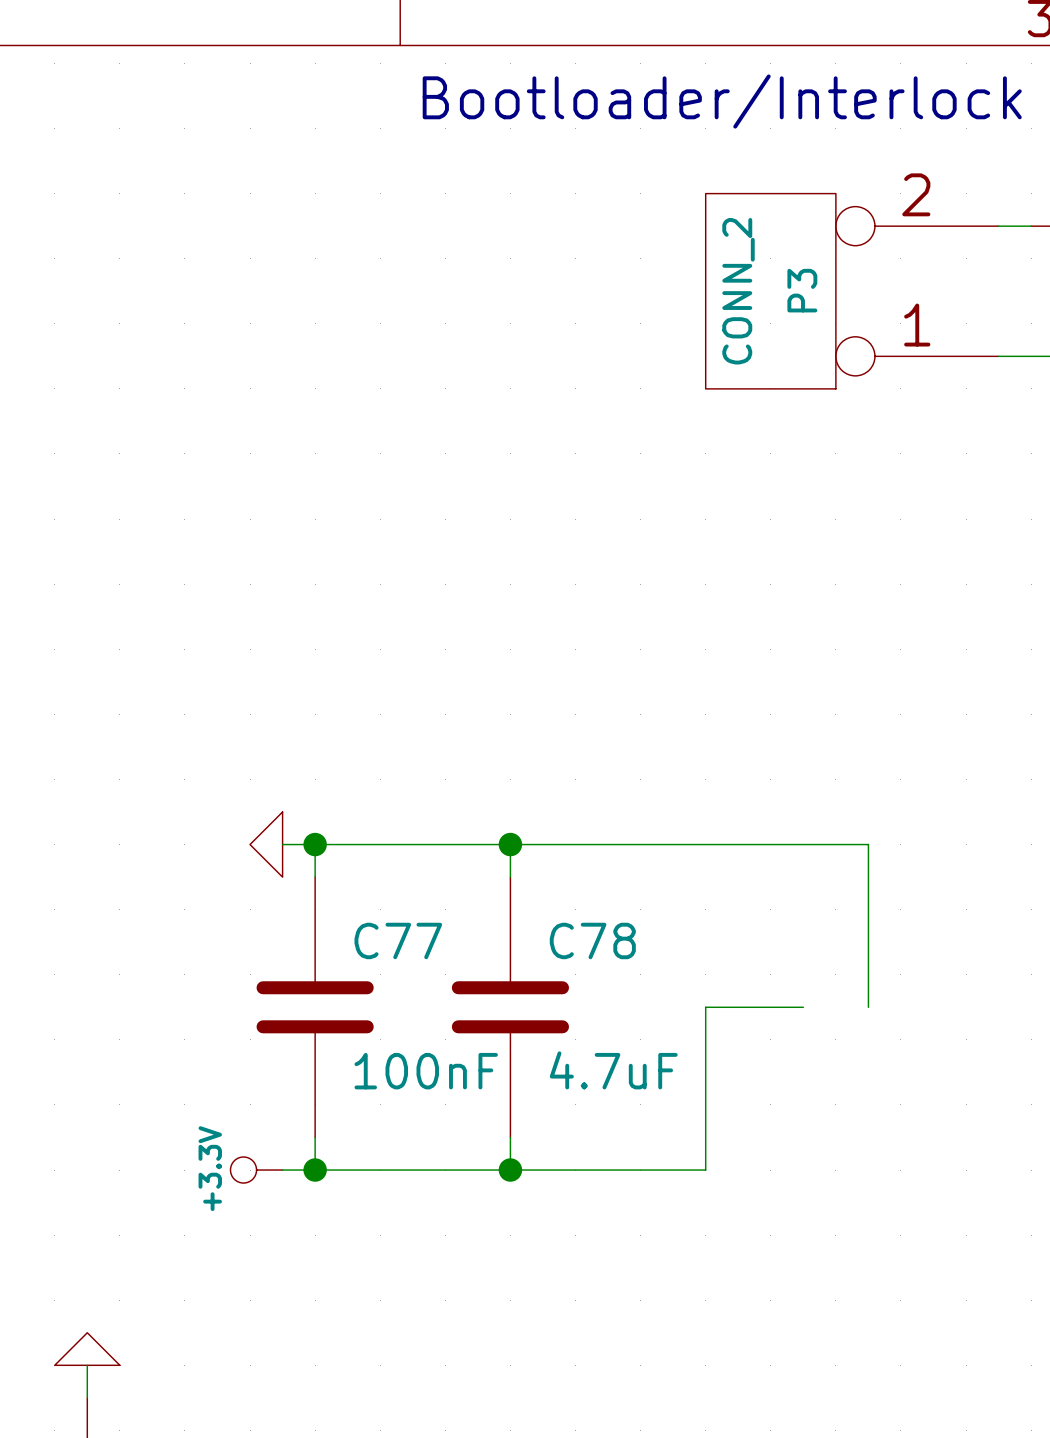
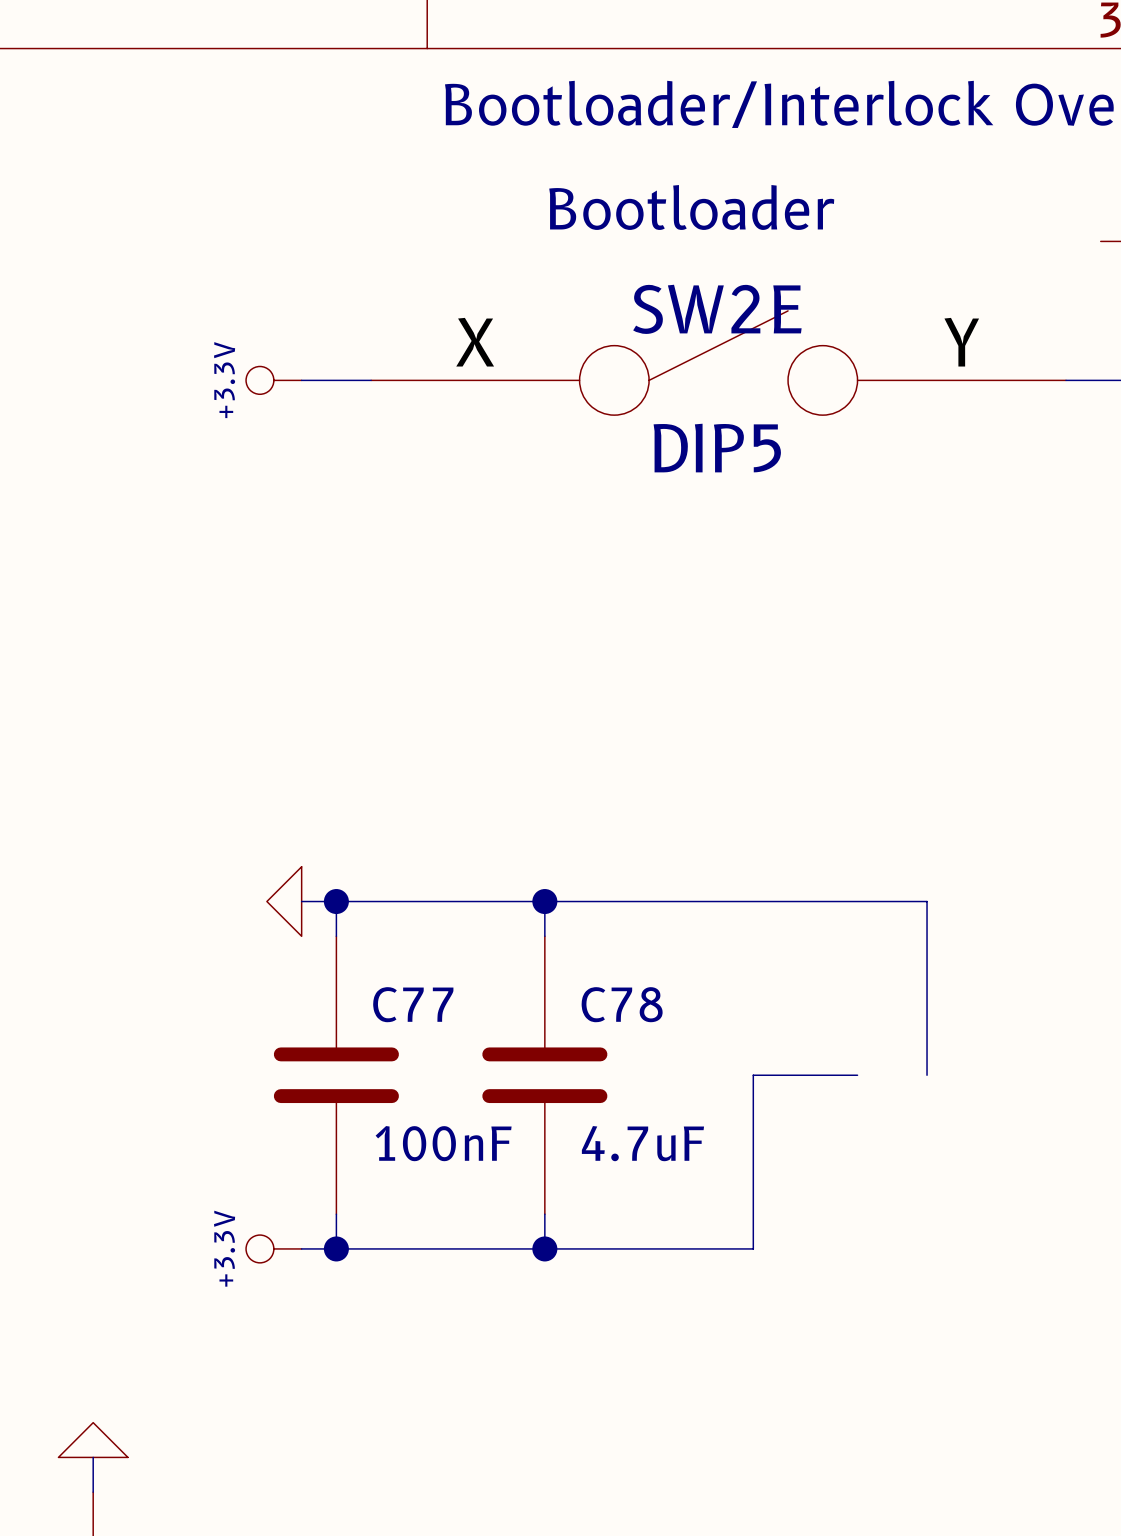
text: none -> Bootloader (691, 207)
wire: (998, 226) (1031, 226) -> none
P3: CONN_2 (852, 291) -> none
SW2E: none -> DIP5 (718, 363)
power symbol: none -> +3.3V (273, 380)
wire: none -> (301, 380) (371, 380)

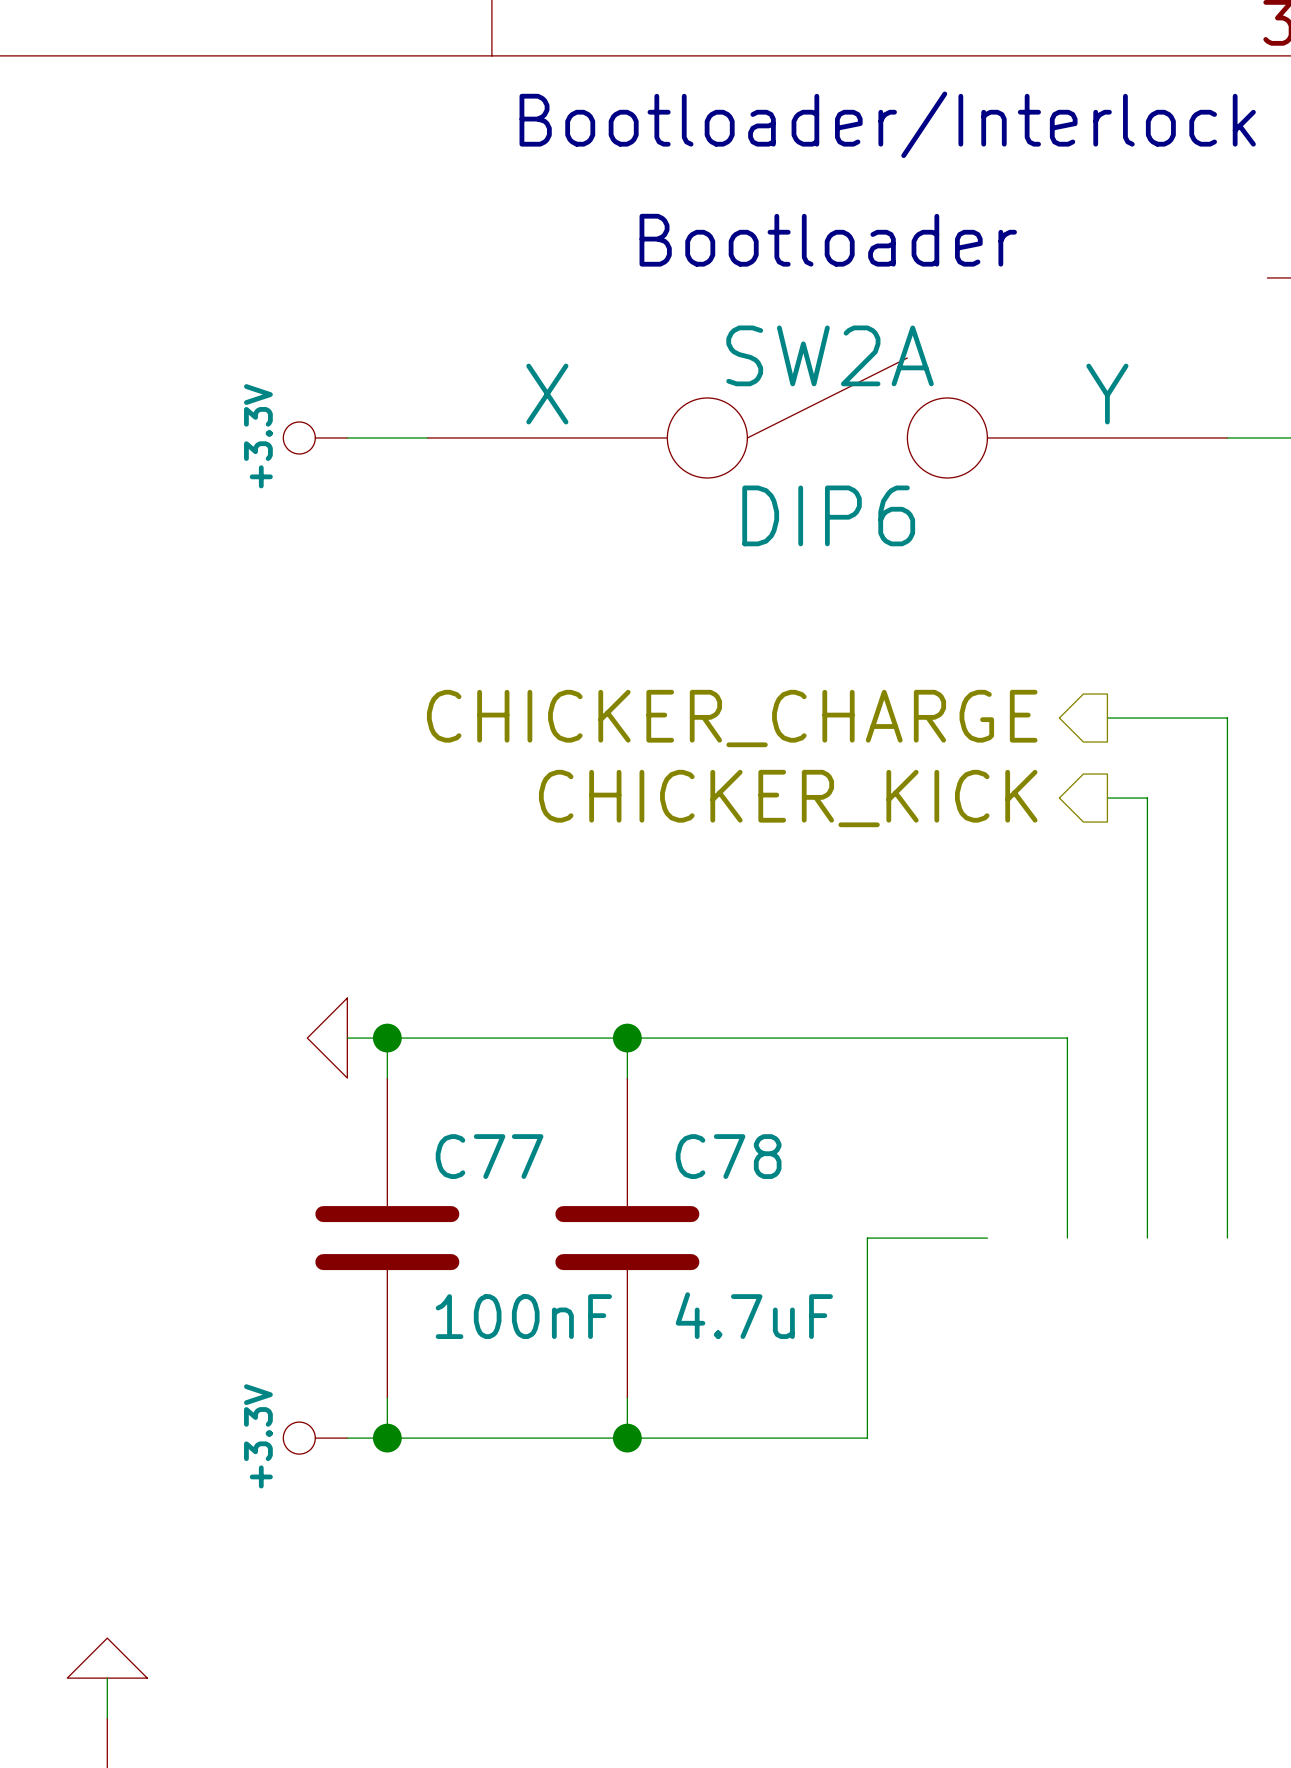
SW2E name: SW2E (717, 309) -> SW2A (830, 355)
SW2E value: DIP5 (717, 448) -> DIP6 (828, 515)
wire: none -> (1107, 718) (1227, 718) (1227, 1238)
hierarchical label: none -> CHICKER_CHARGE (732, 718)
wire: none -> (1107, 798) (1147, 798) (1147, 1238)
hierarchical label: none -> CHICKER_KICK (788, 798)

